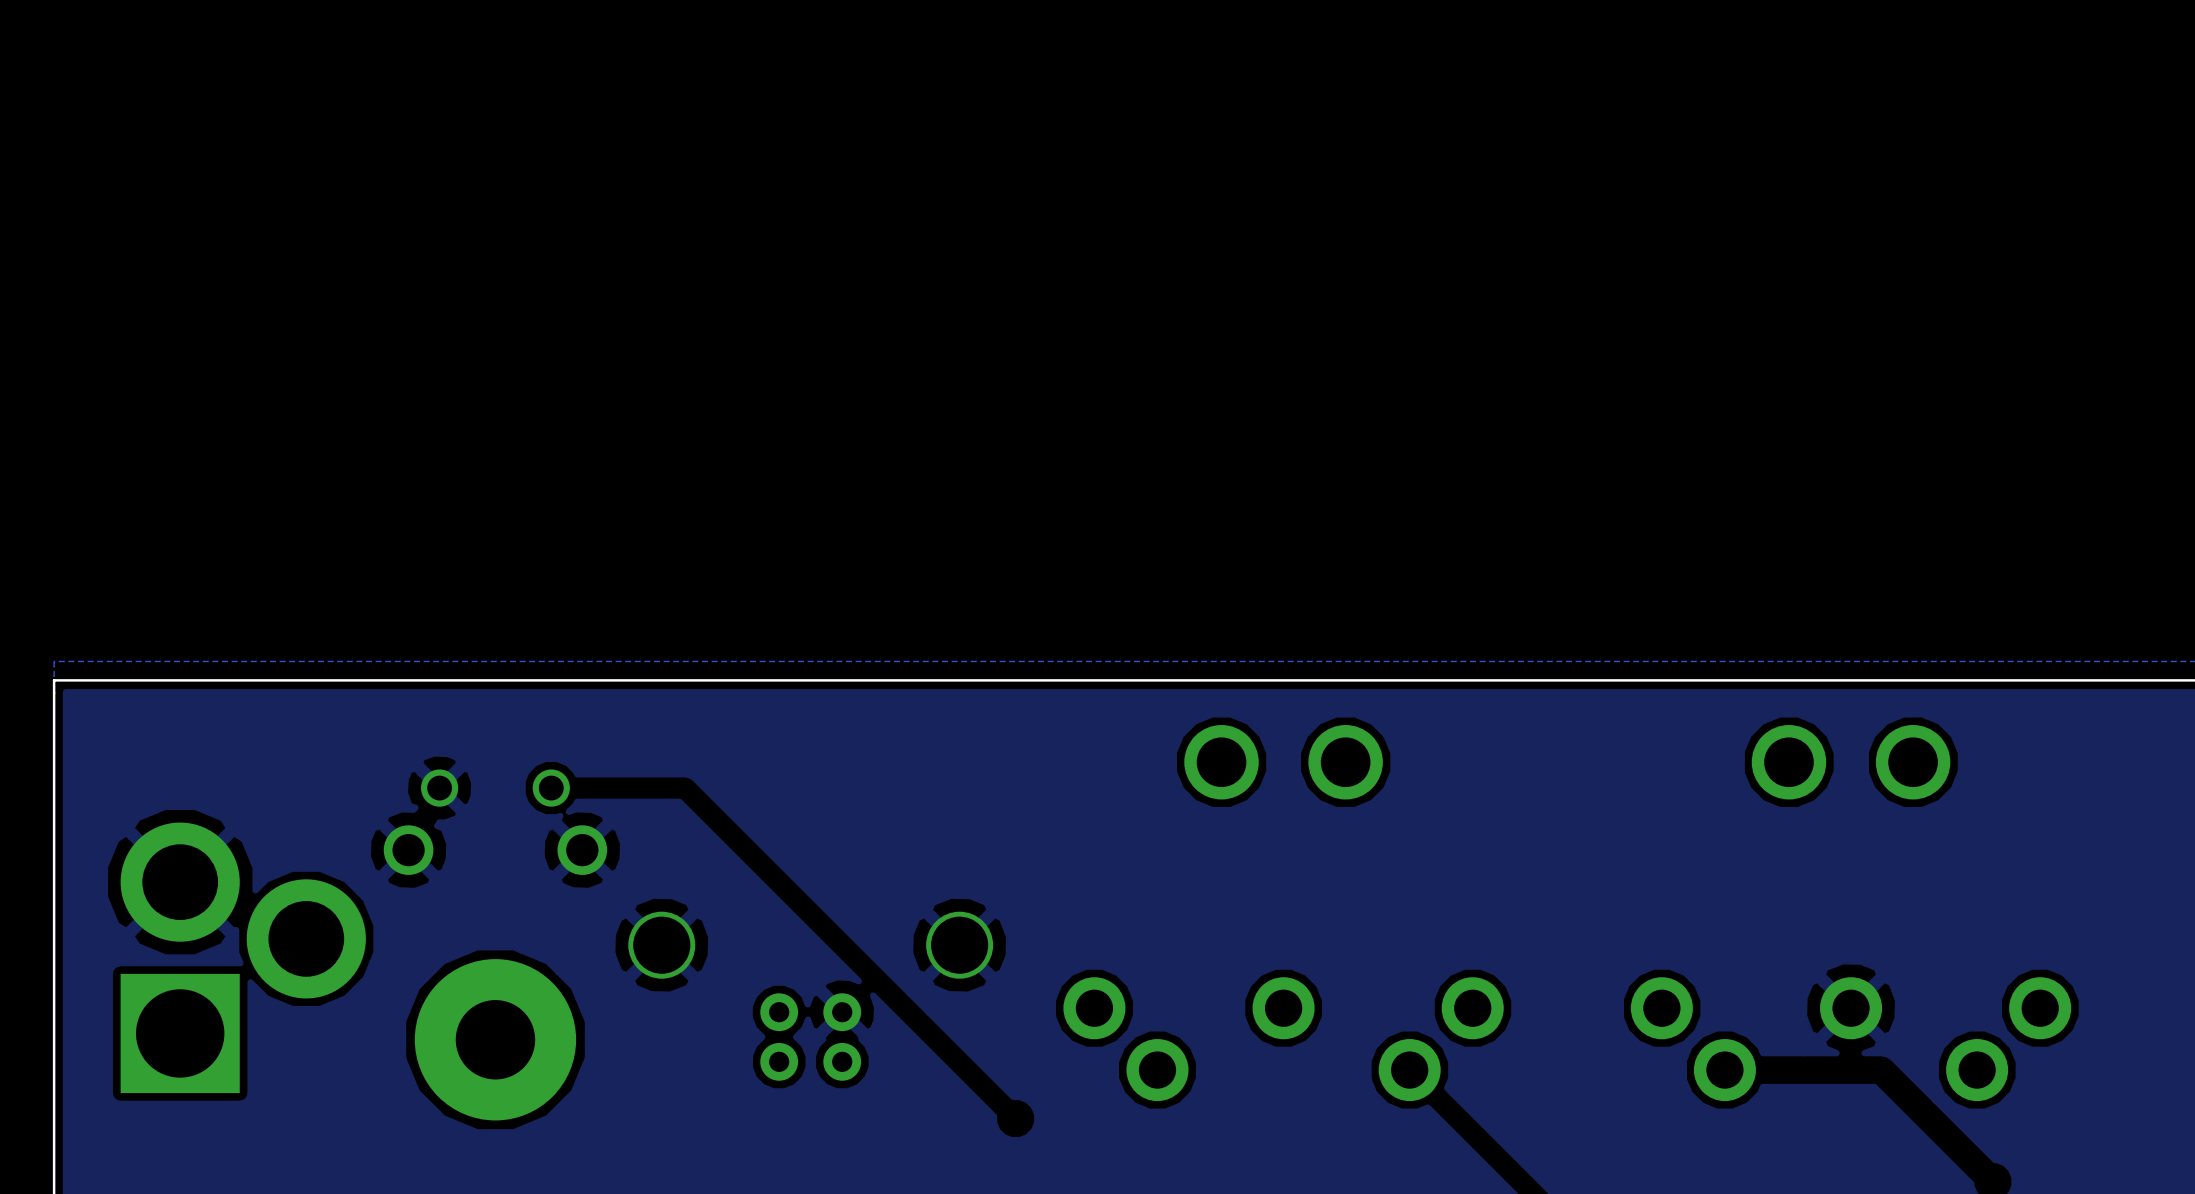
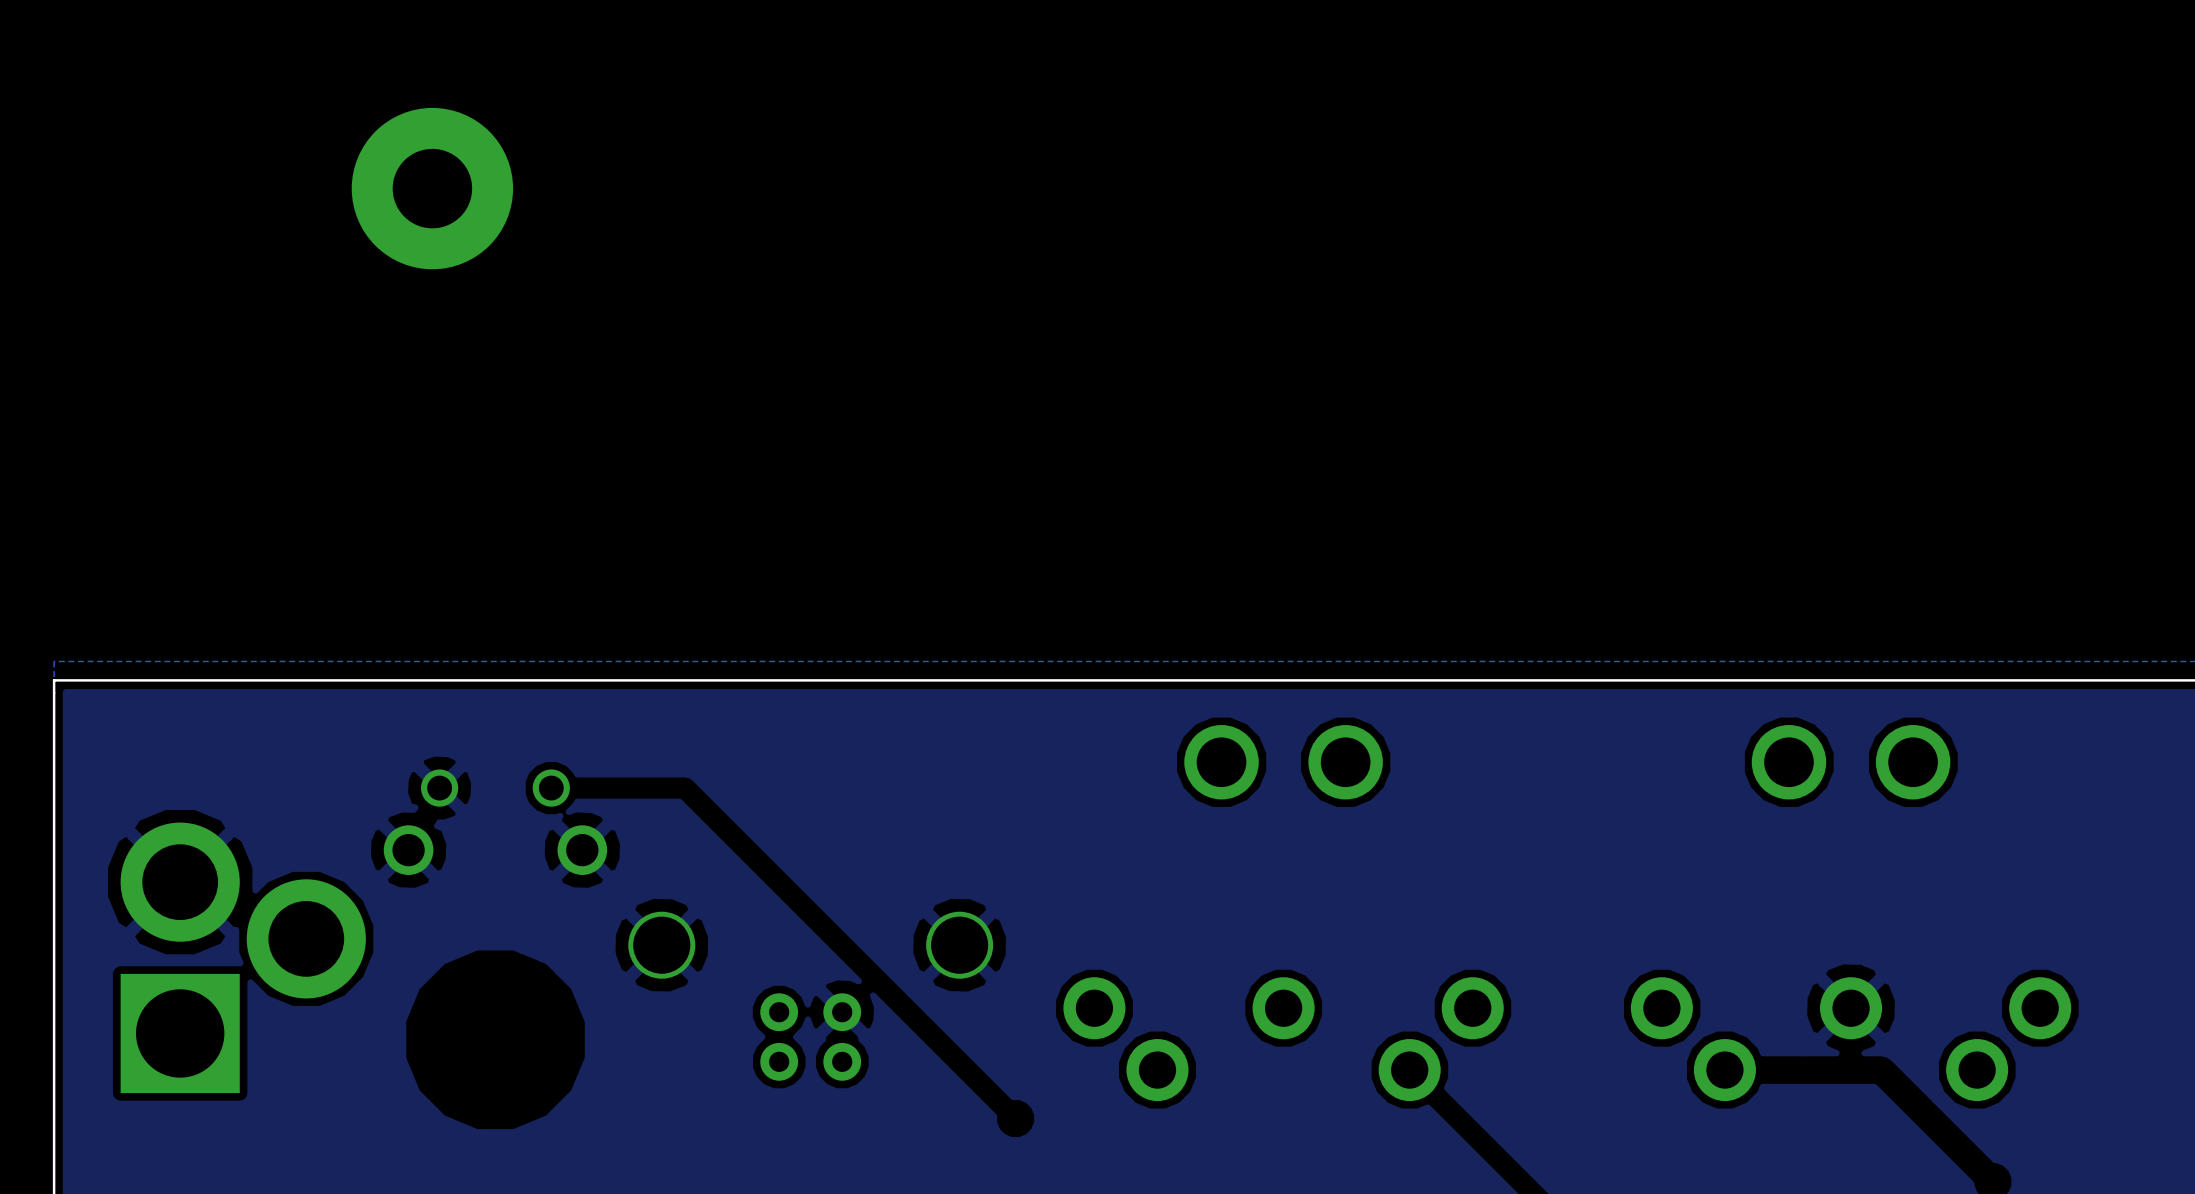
part: none -> (432, 188)
part: (495, 1039) -> none

